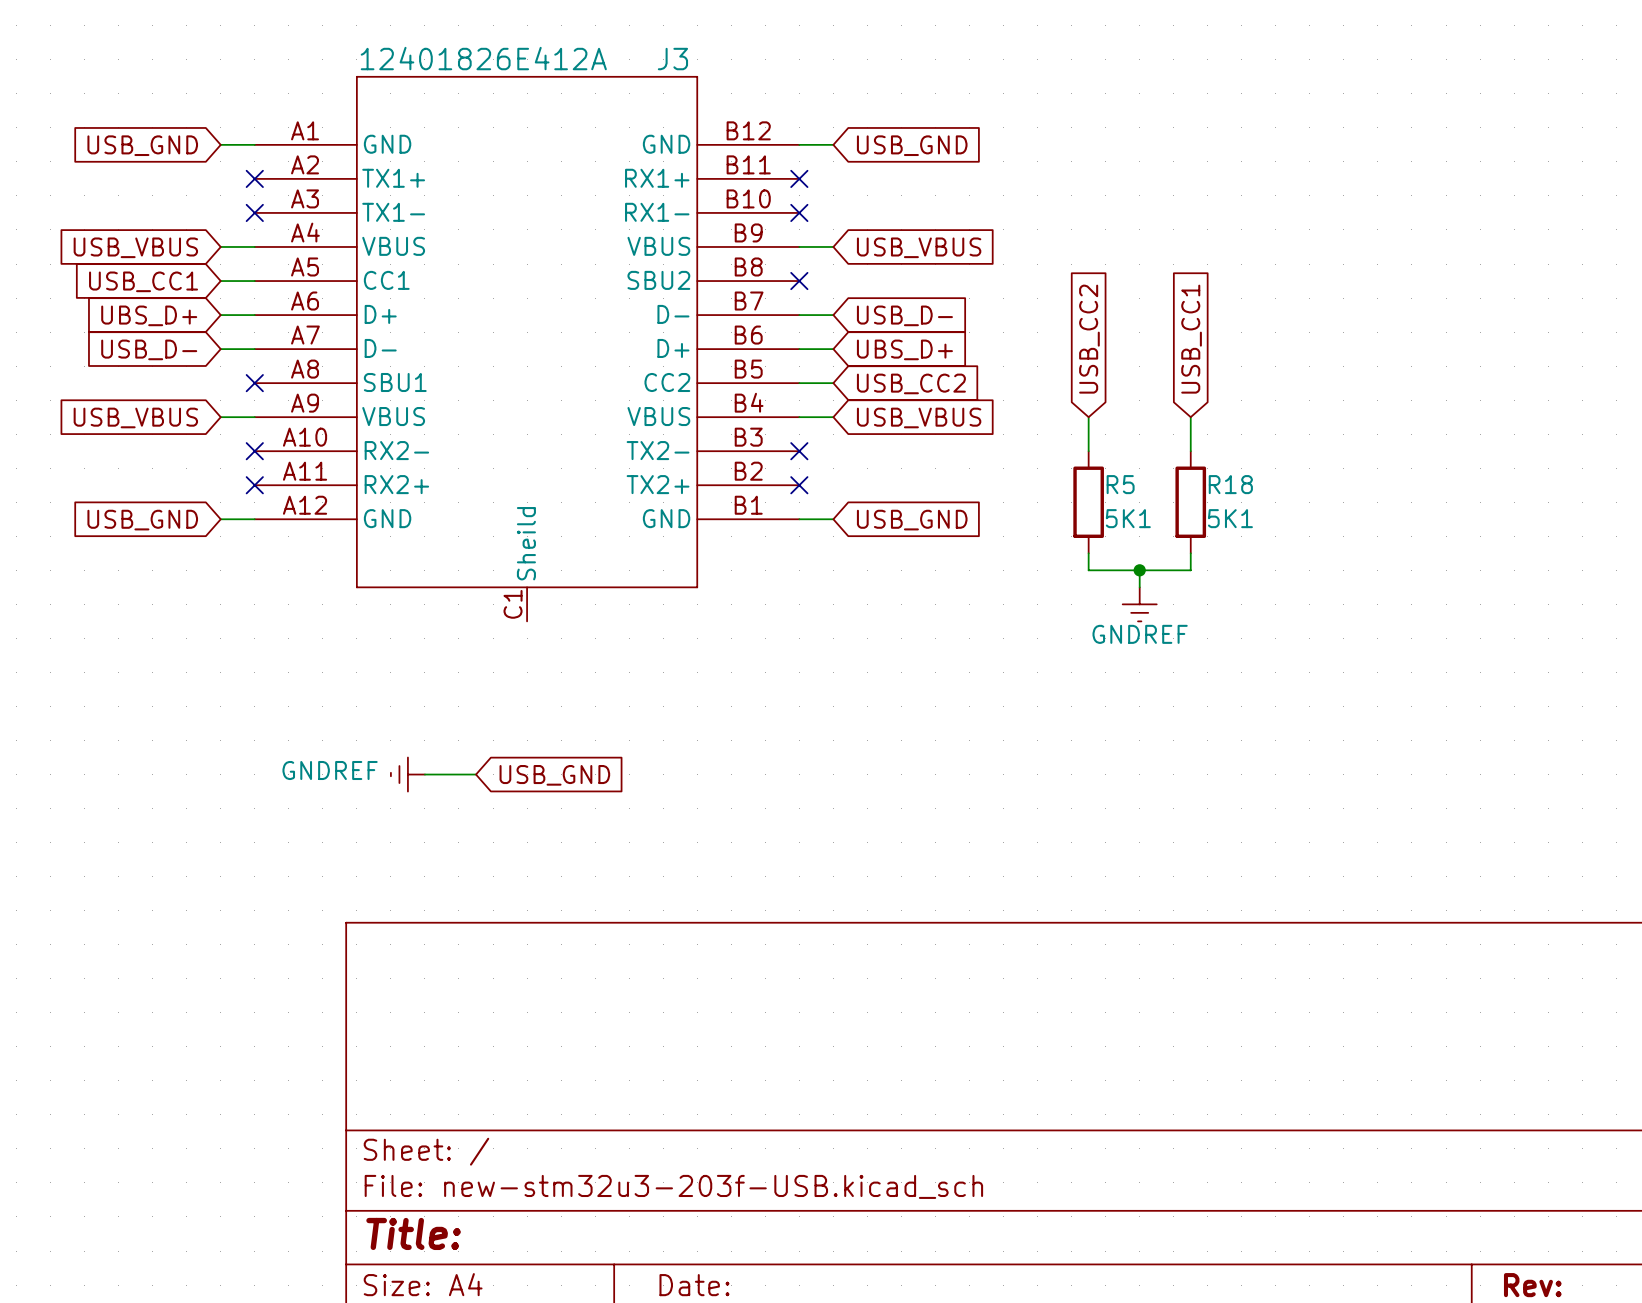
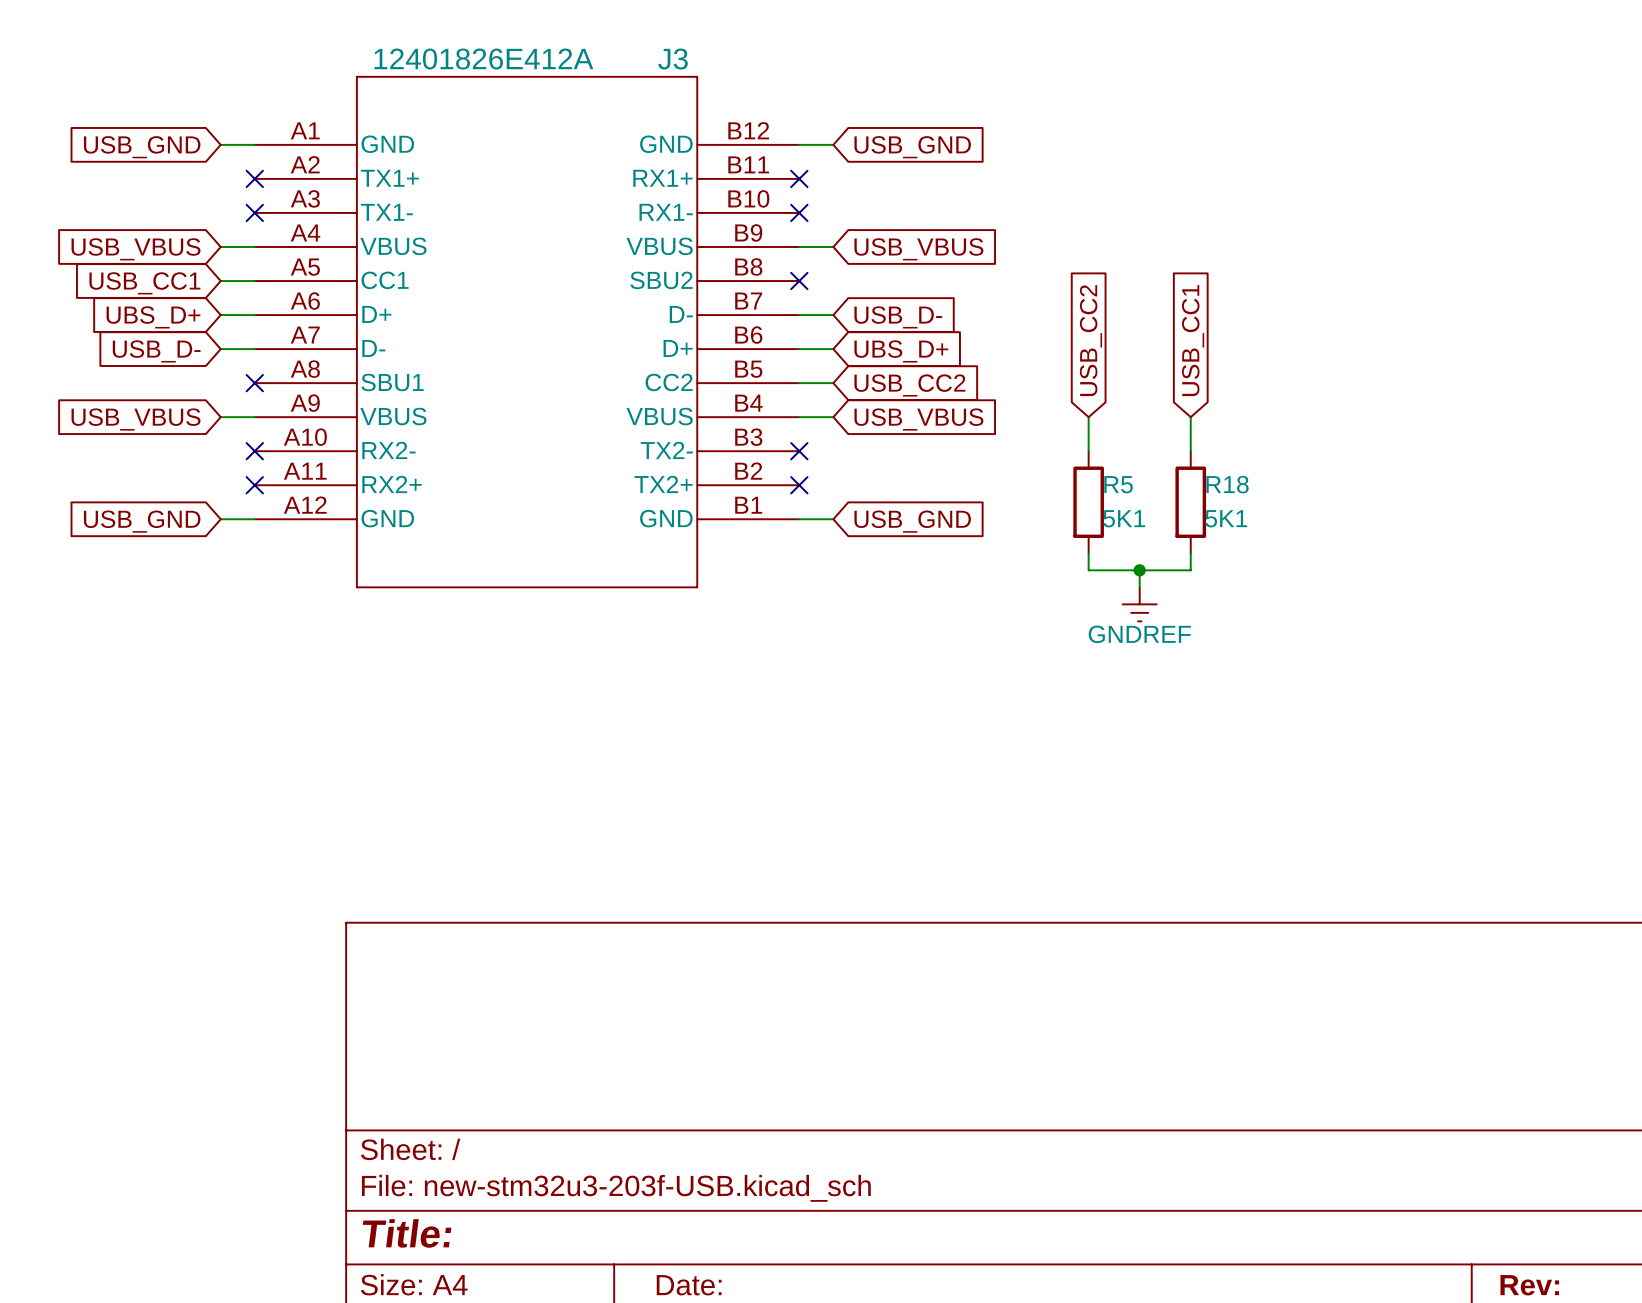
J3 symbol: [254, 75, 800, 622] -> [254, 75, 800, 589]
power symbol: GNDREF (407, 774) -> none
wire: (424, 774) (476, 774) -> none
global label: USB_GND (554, 775) -> none

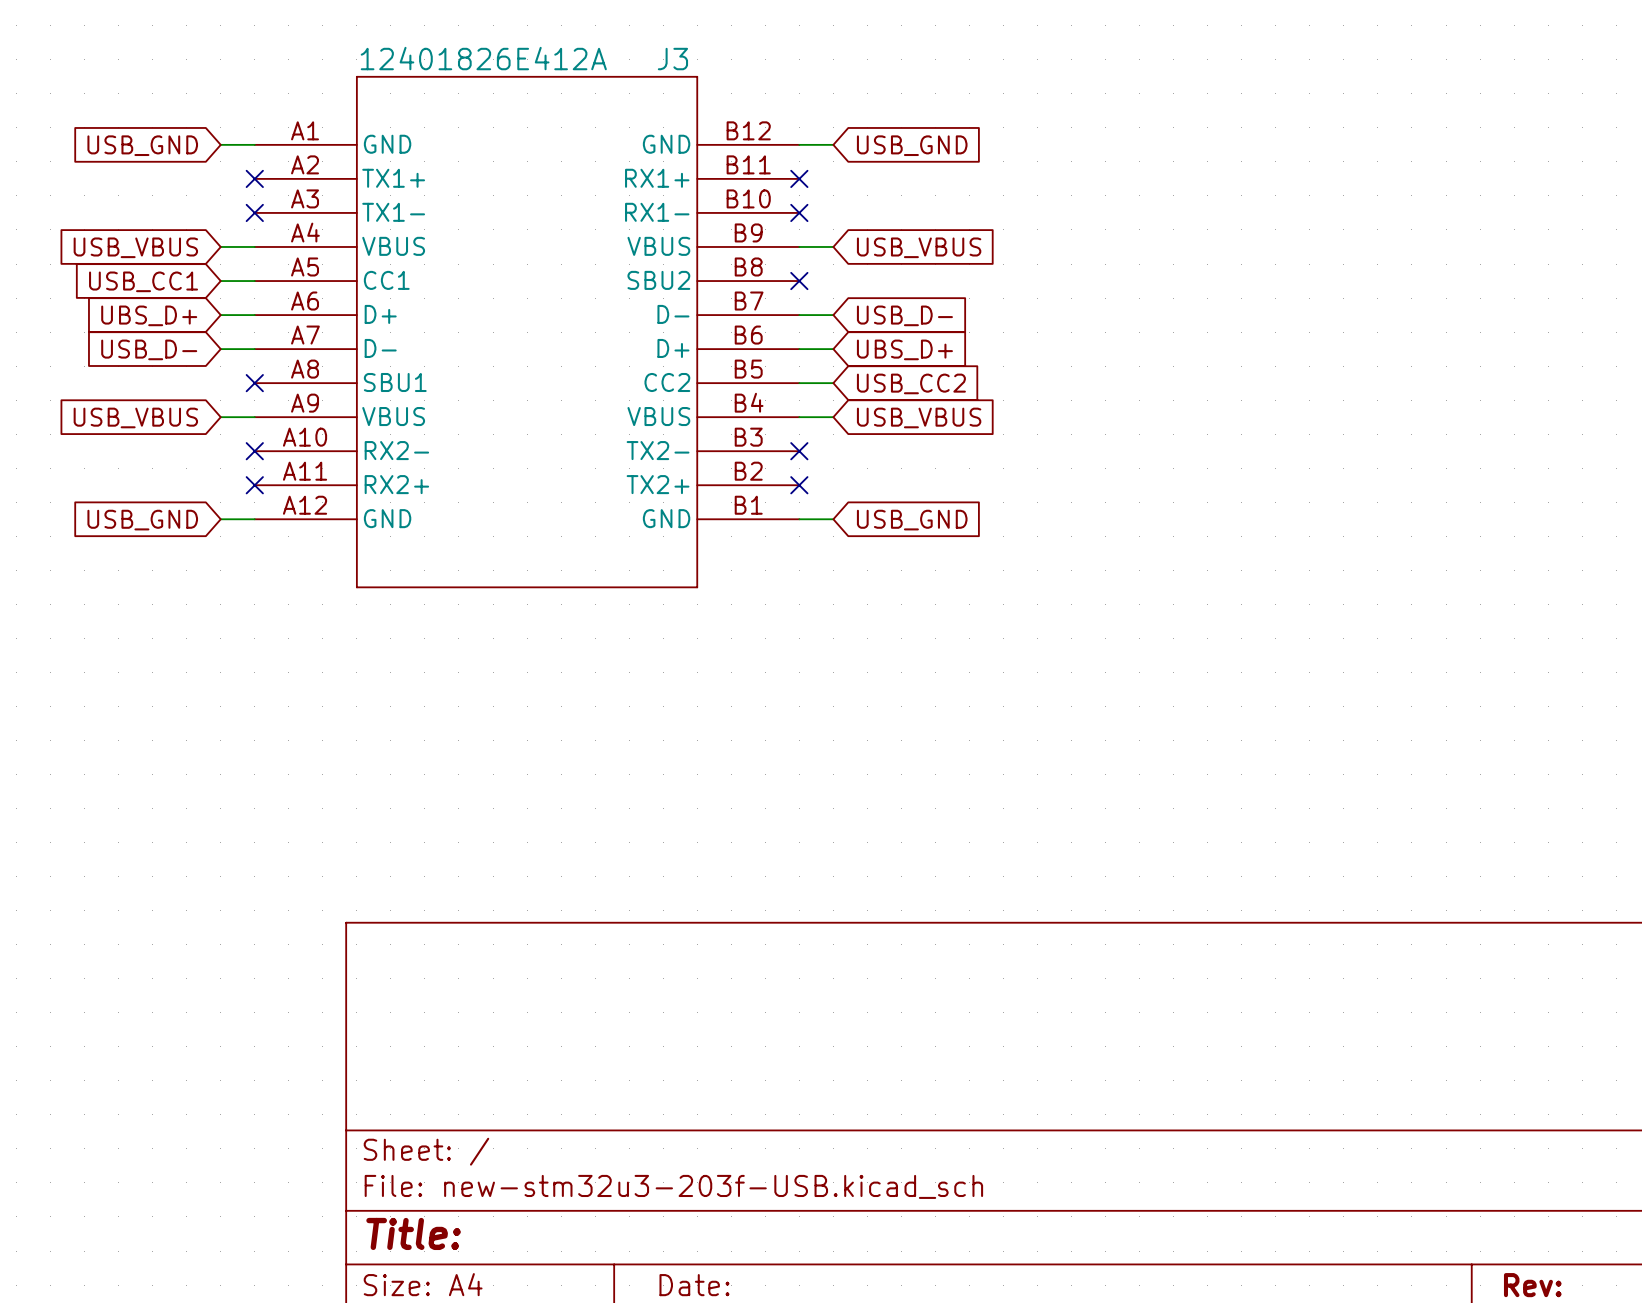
global label: USB_CC2 (1090, 340) -> none
global label: USB_CC1 (1193, 340) -> none
wire: (1088, 417) (1088, 451) -> none
wire: (1190, 417) (1190, 451) -> none
R5: 5K1 (1088, 502) -> none
R18: 5K1 (1190, 502) -> none
wire: (1088, 553) (1088, 570) (1190, 570) (1190, 553) -> none
wire: (1139, 570) (1139, 587) -> none
junction: (1139, 570) -> none
power symbol: GNDREF (1139, 604) -> none

